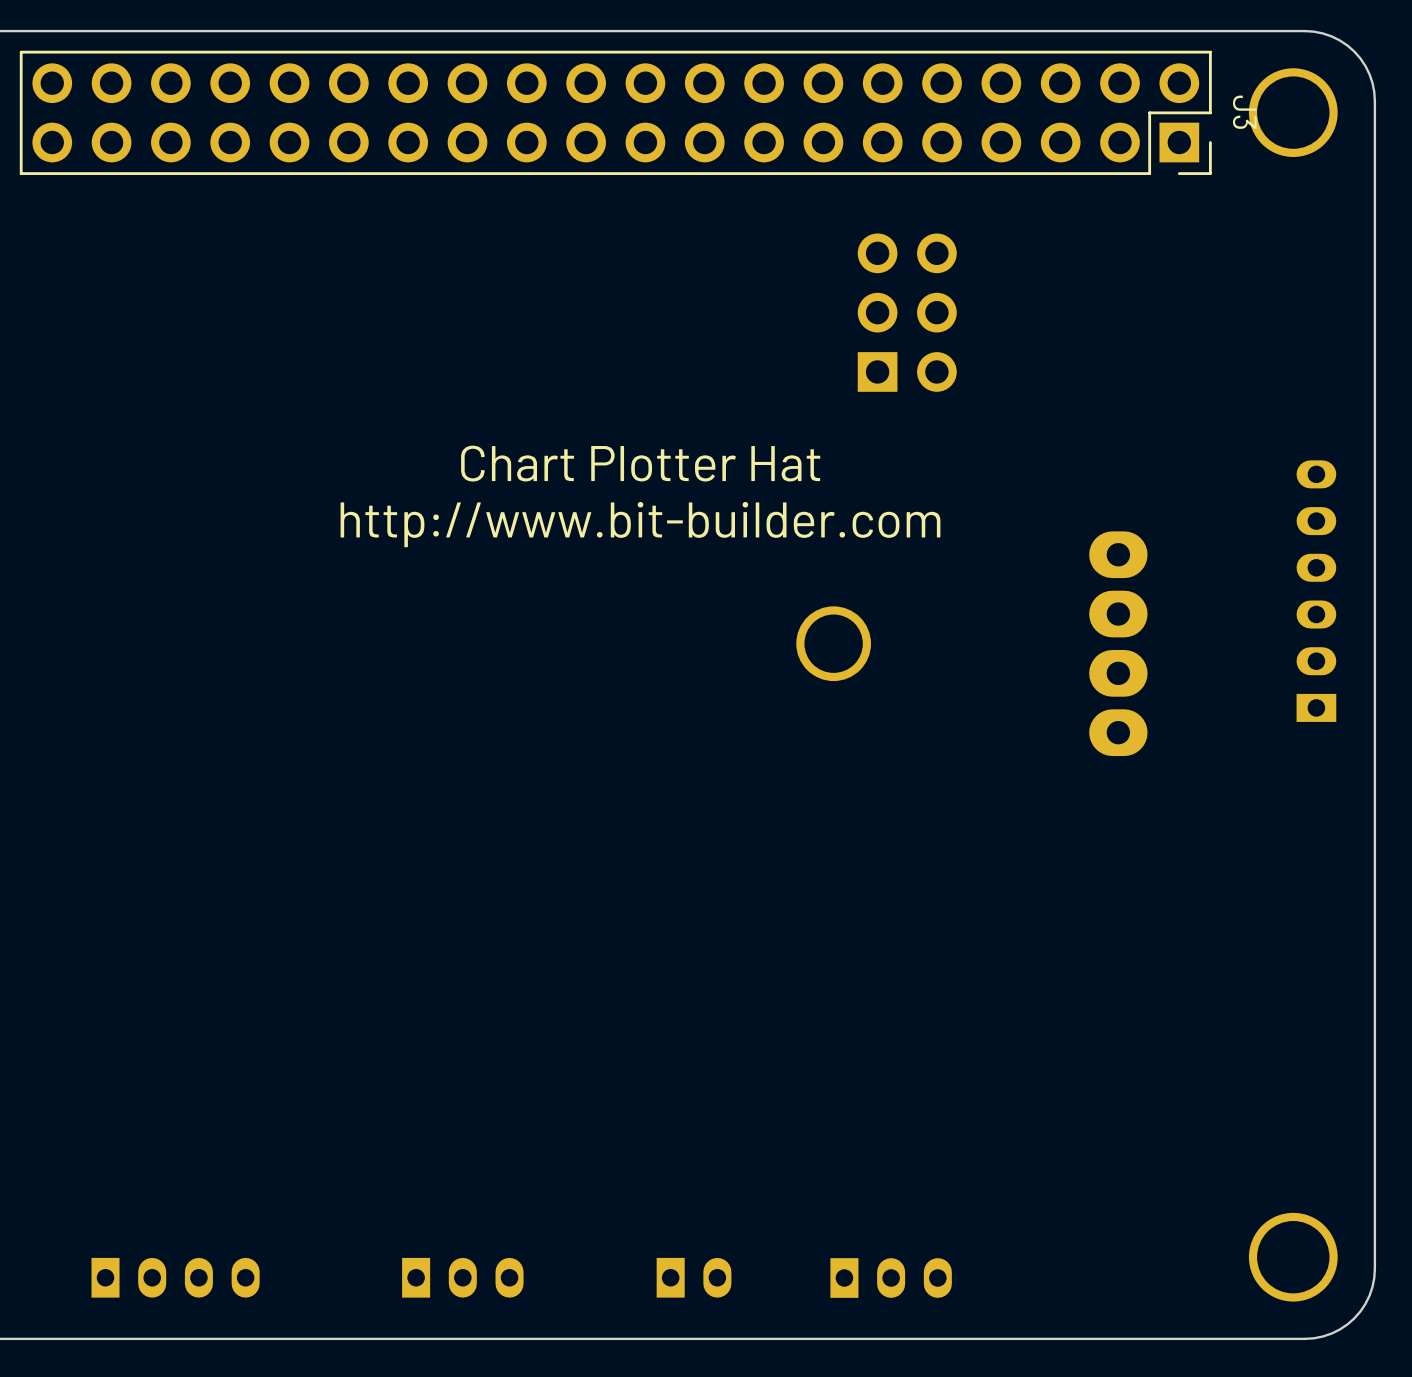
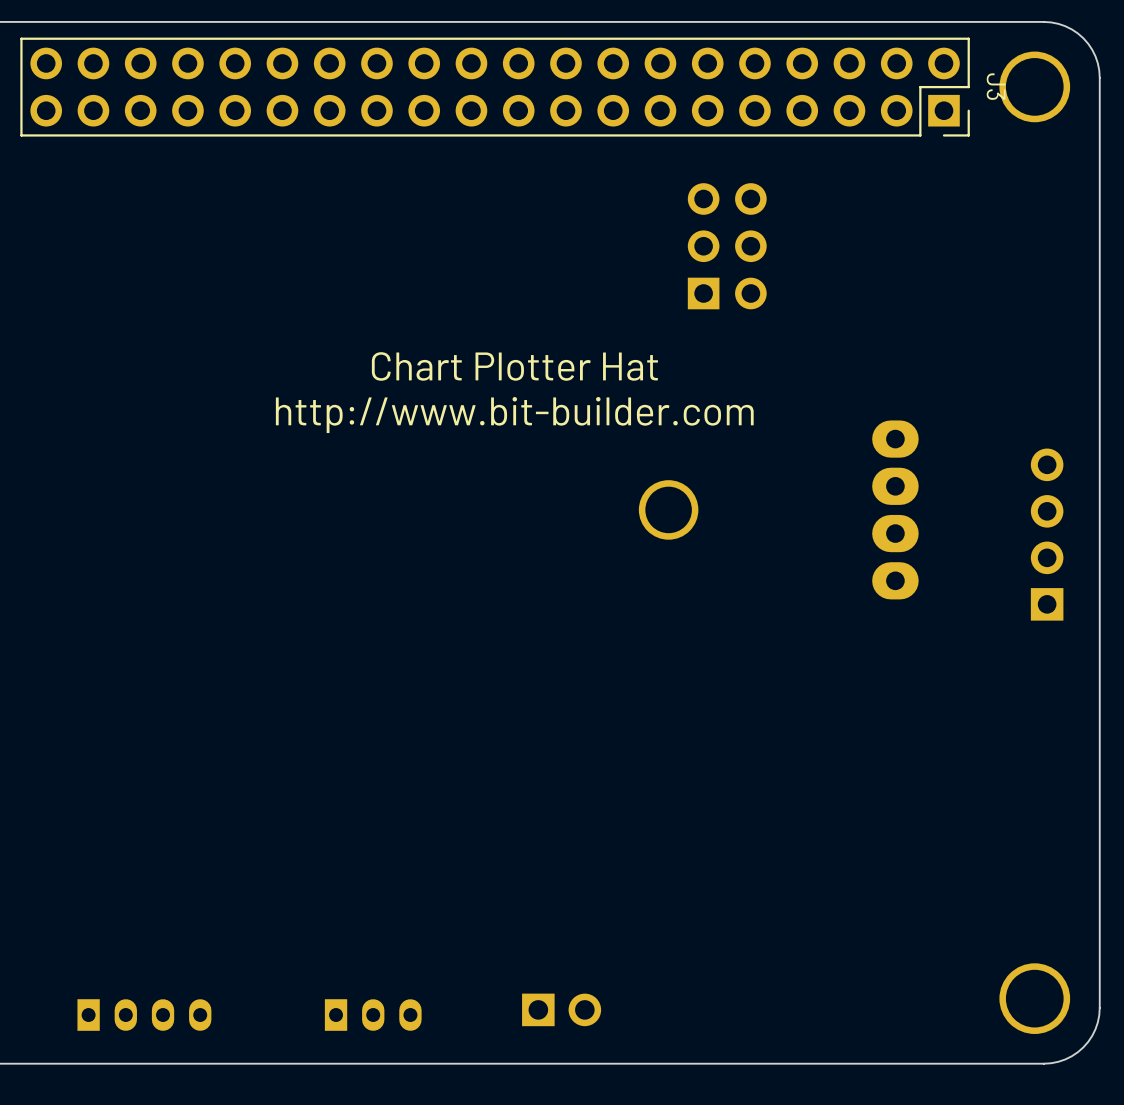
part: (1316, 591) -> none
part: none -> (1047, 534)
part footprint: [656, 1257, 732, 1298] -> [522, 993, 602, 1027]
part: (891, 1277) -> none

